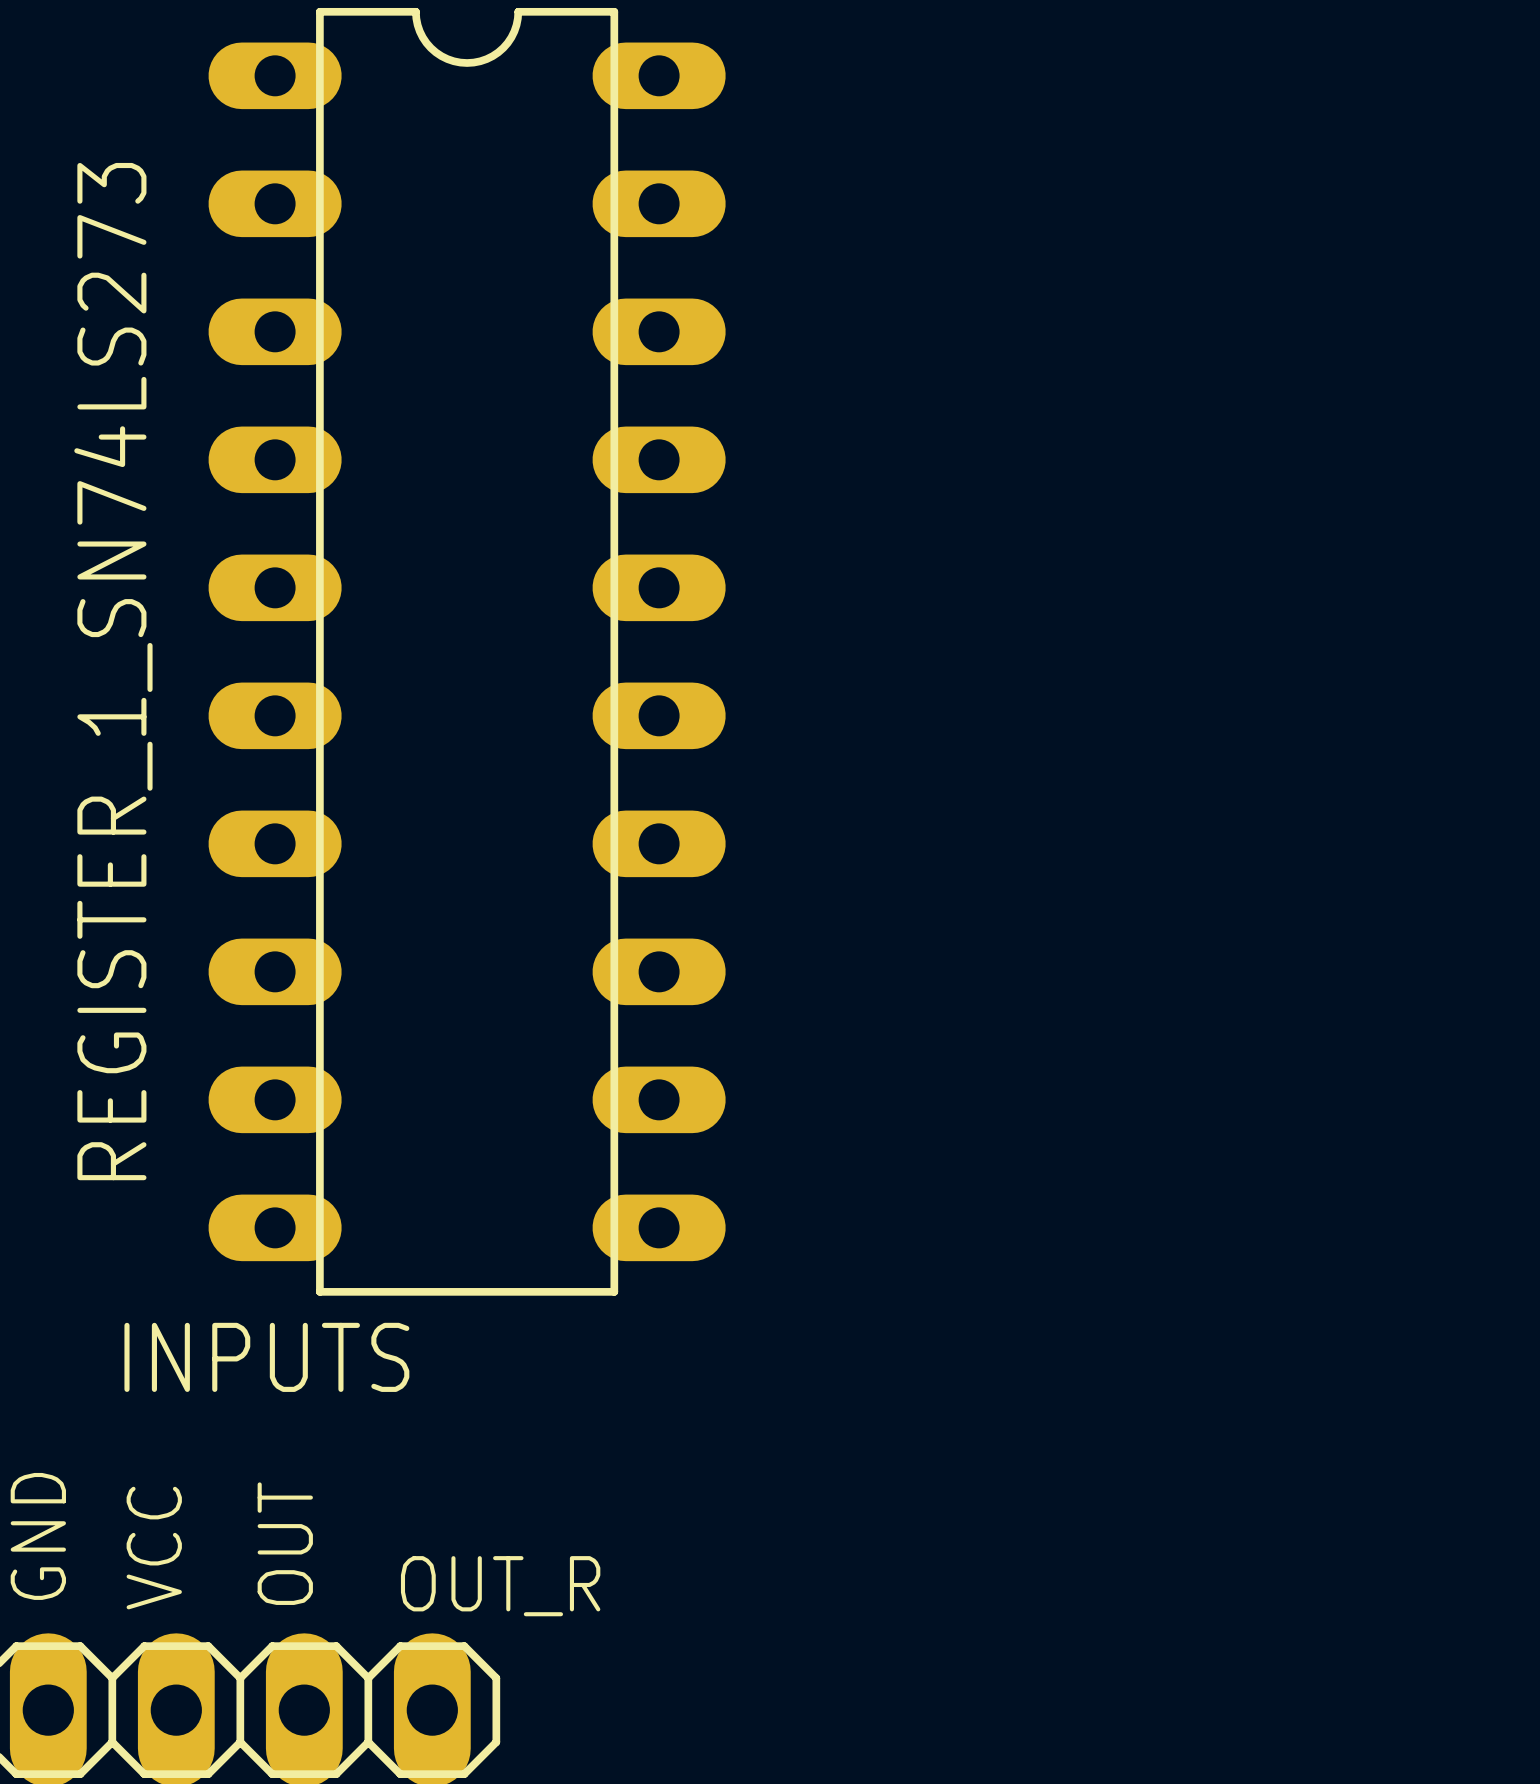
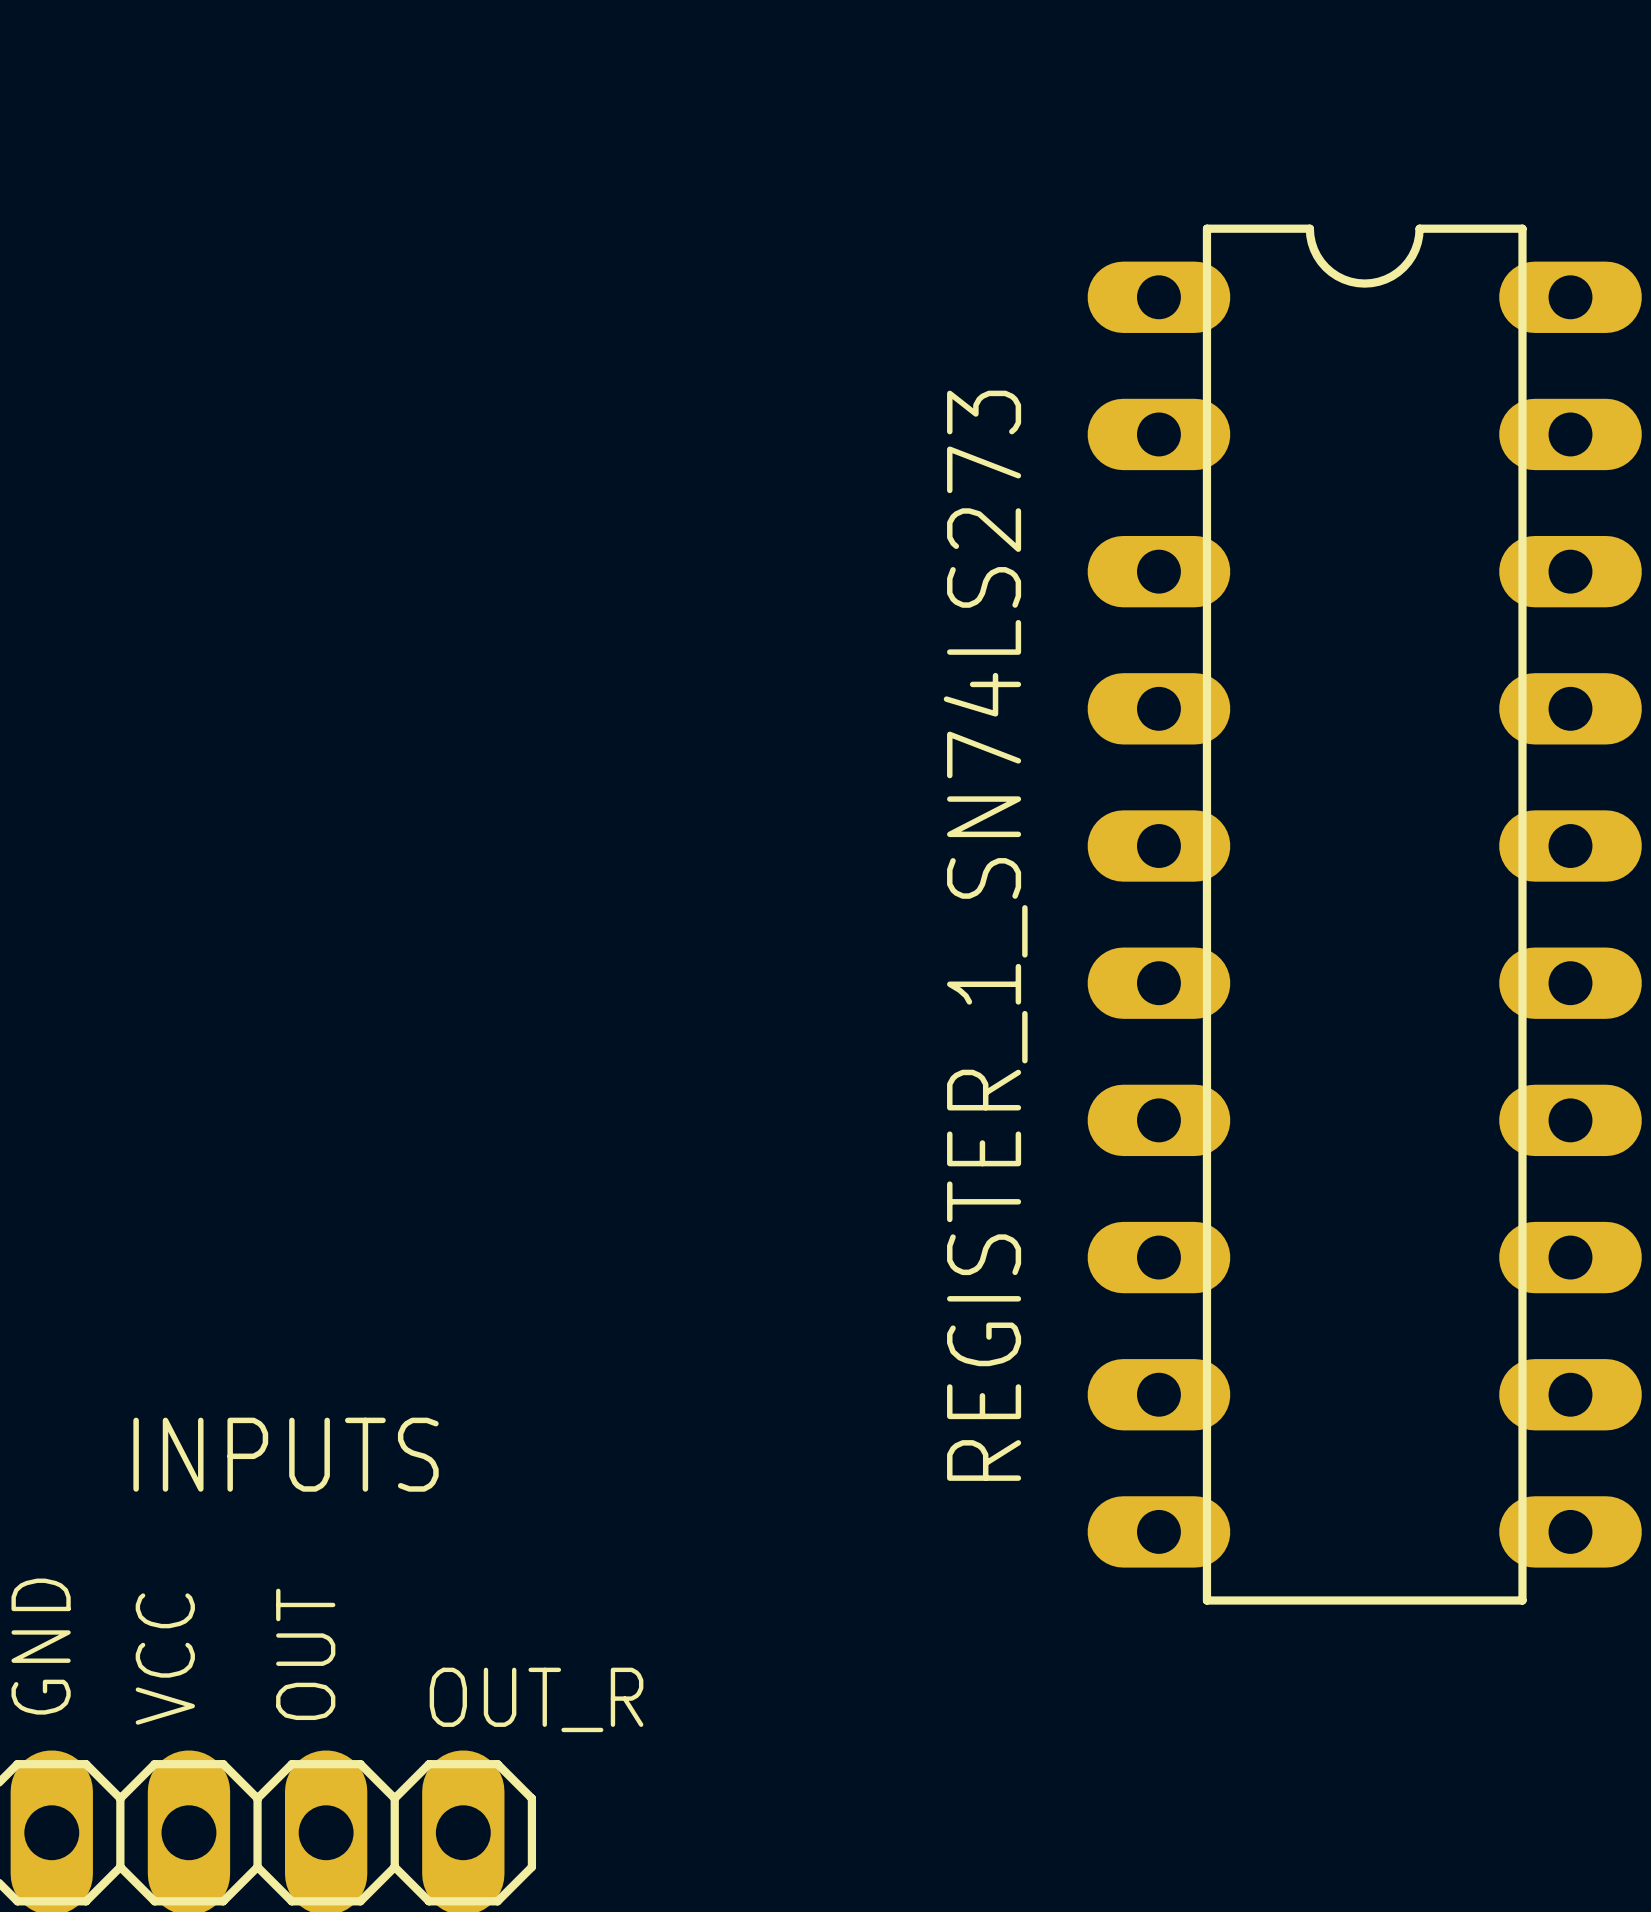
REGISTER_1_SN74LS273 position: (467, 651) -> (1364, 914)

